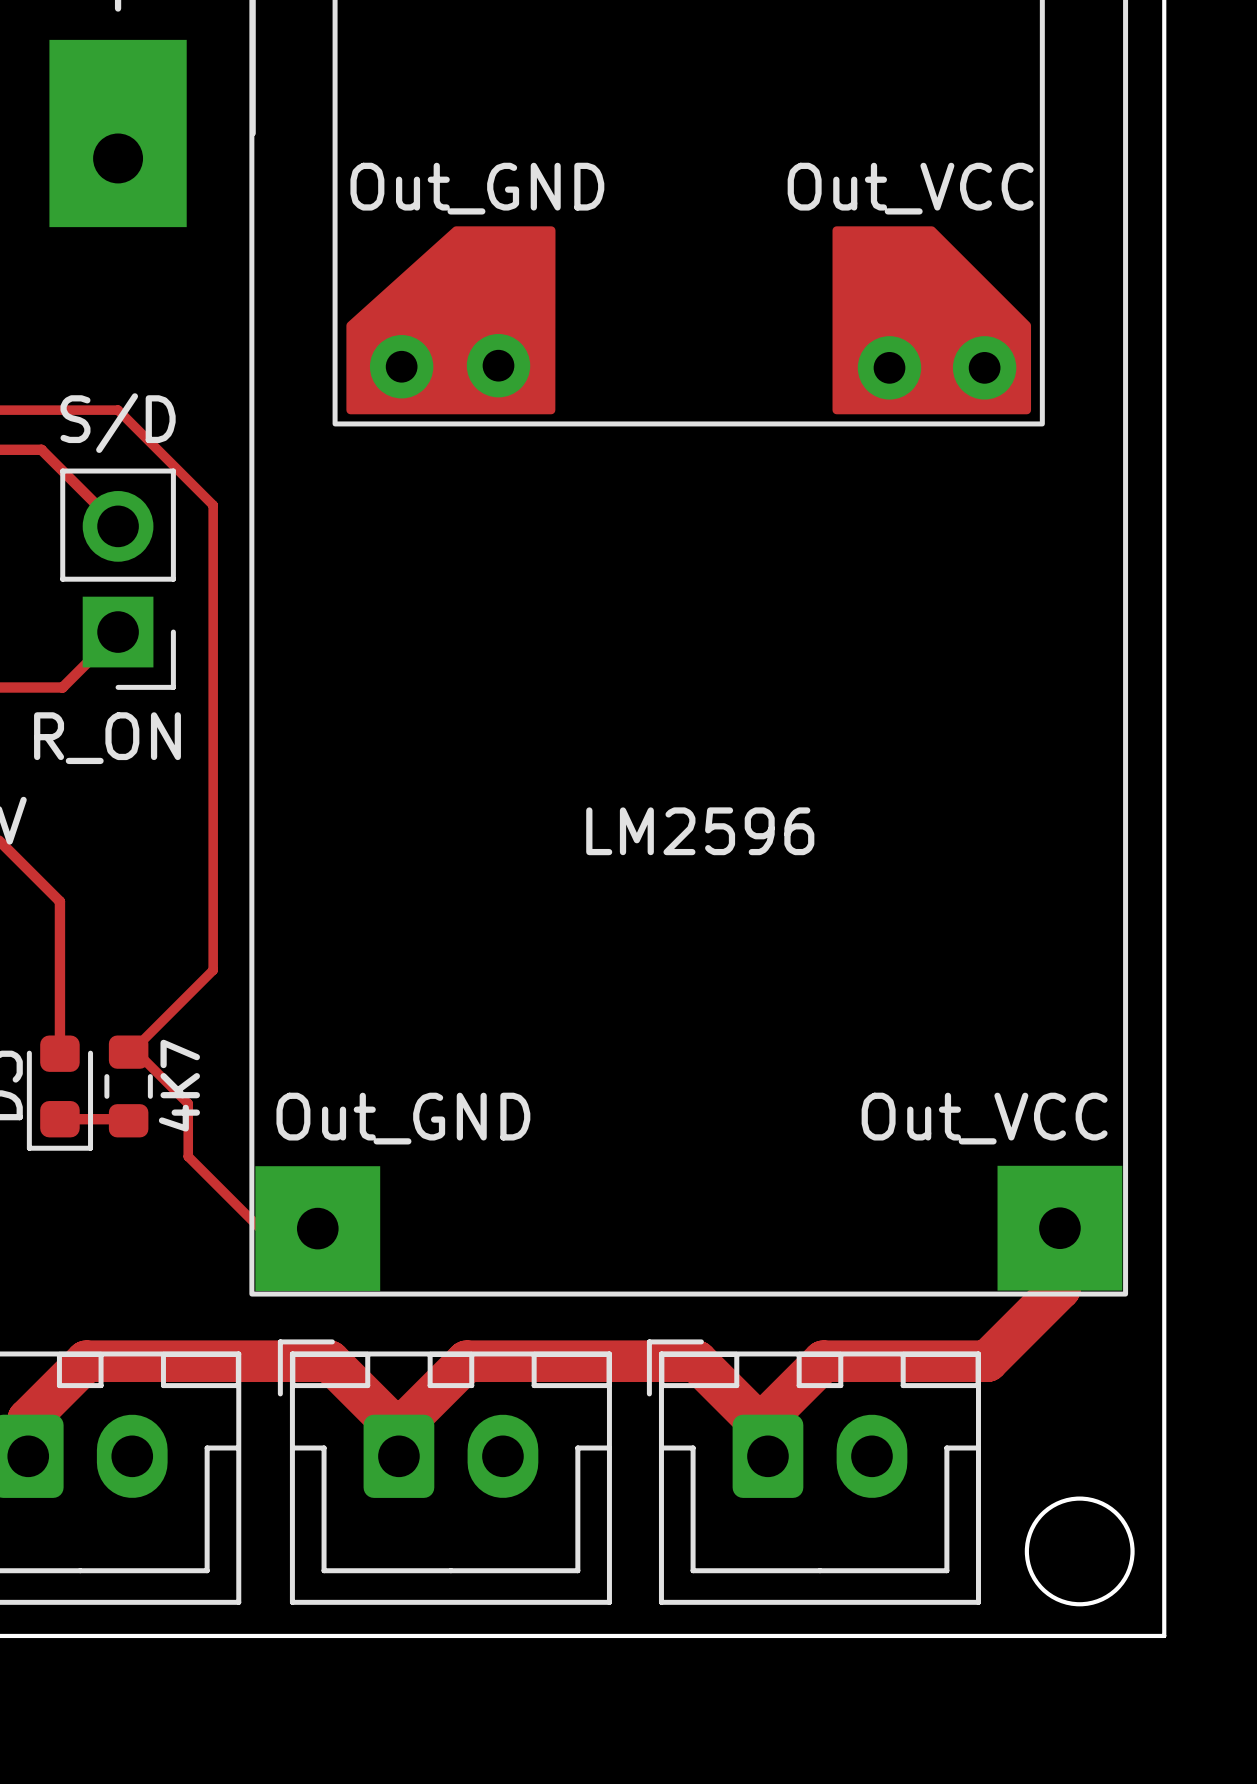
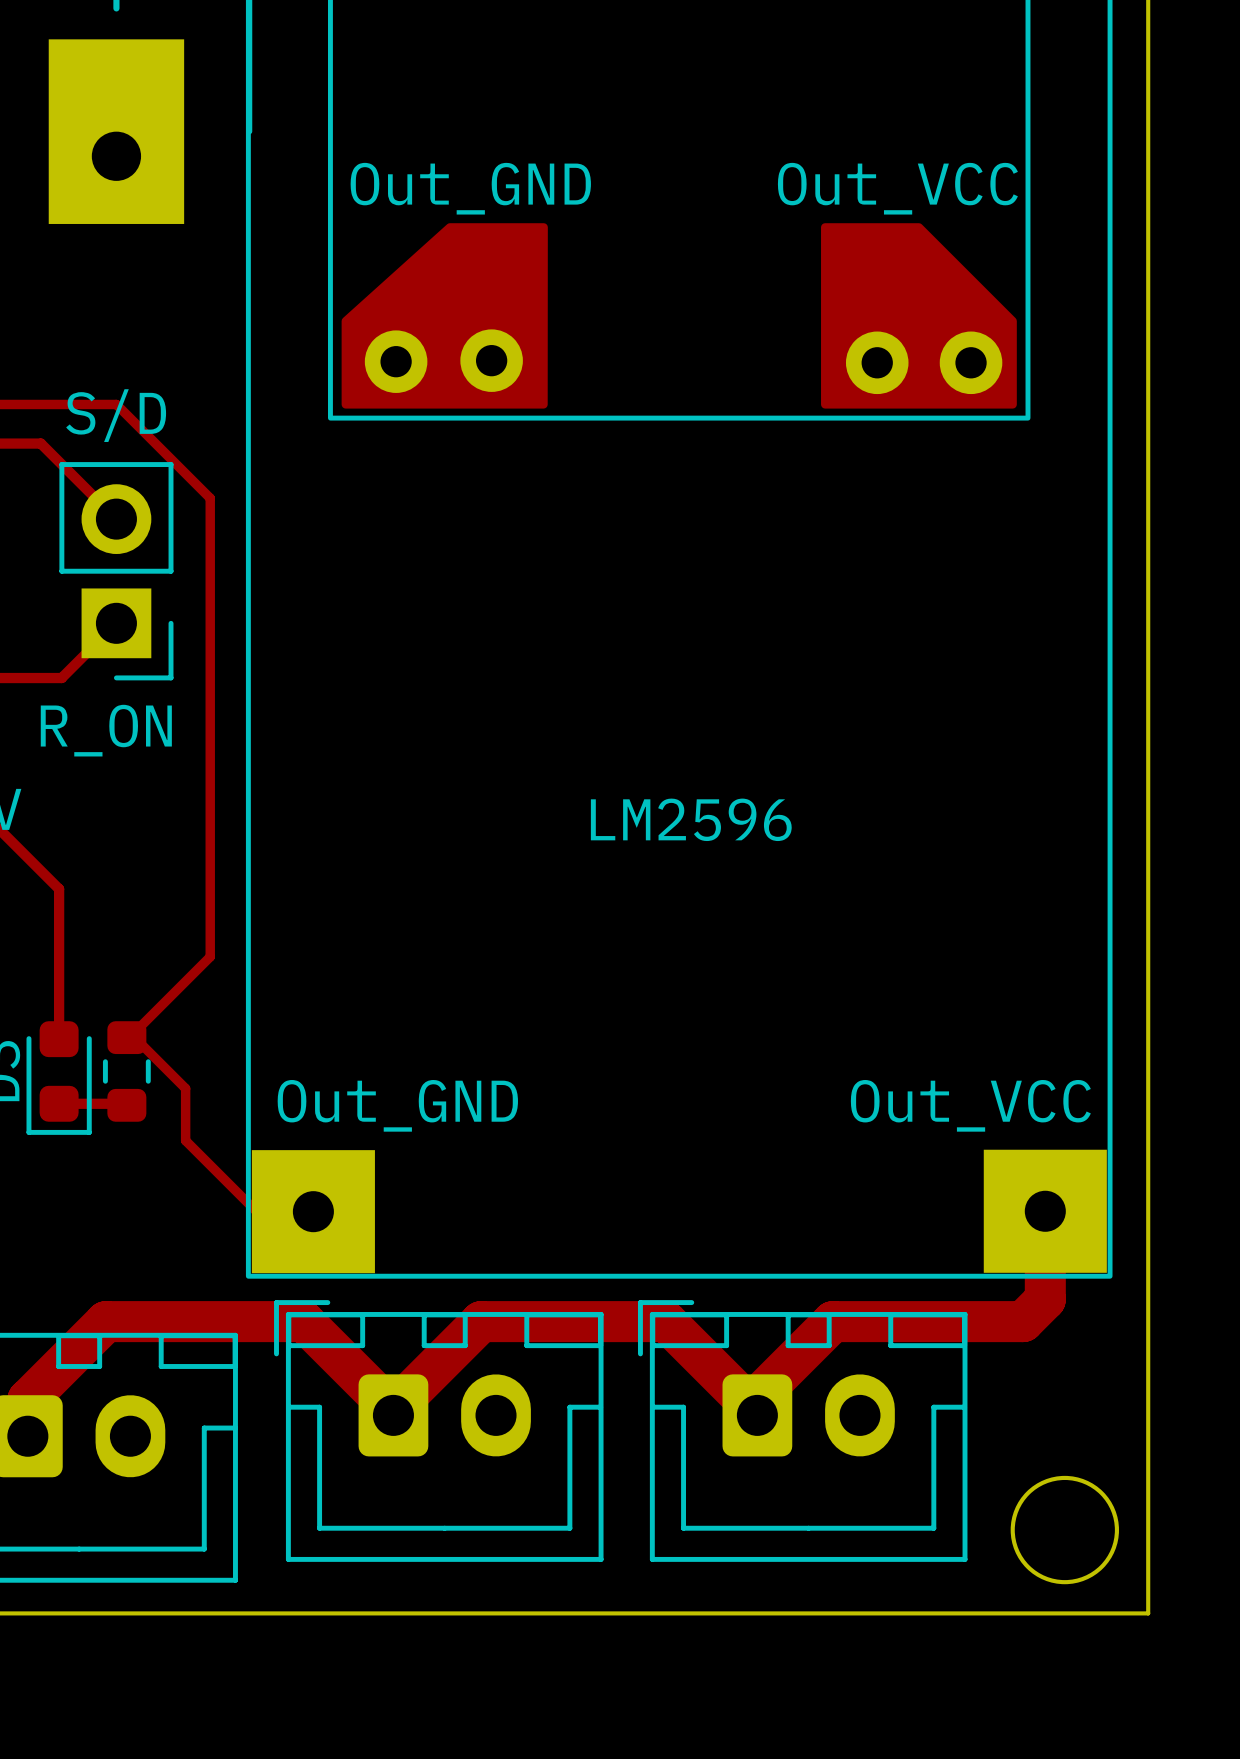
text: 4K7 (179, 1085) -> none
track: (1059, 1288) (987, 1361) (823, 1361) -> (1045, 1270) (1045, 1299) (1023, 1321) (832, 1321) (812, 1342)
track: (86, 1361) (329, 1361) -> (85, 1342) (106, 1321) (304, 1321) (324, 1342)
track: (466, 1361) (696, 1361) -> (460, 1342) (481, 1321) (666, 1321) (687, 1342)
part position: (444, 1472) -> (438, 1430)
part position: (813, 1472) -> (802, 1430)

